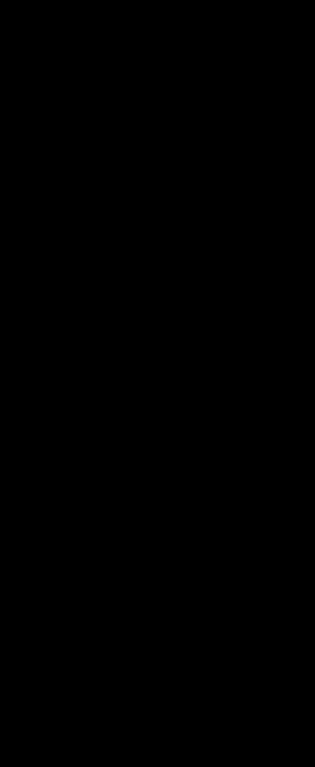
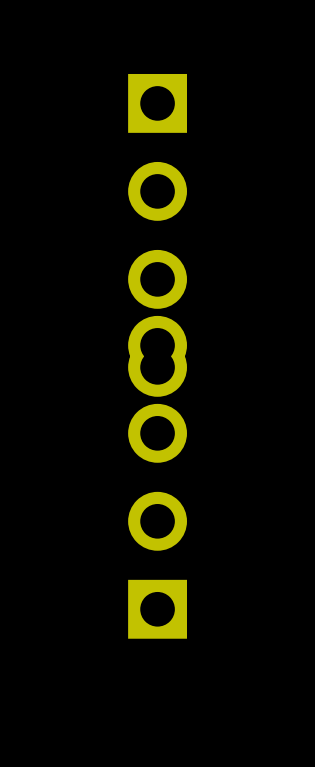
part: none -> (157, 235)
part: none -> (157, 477)

